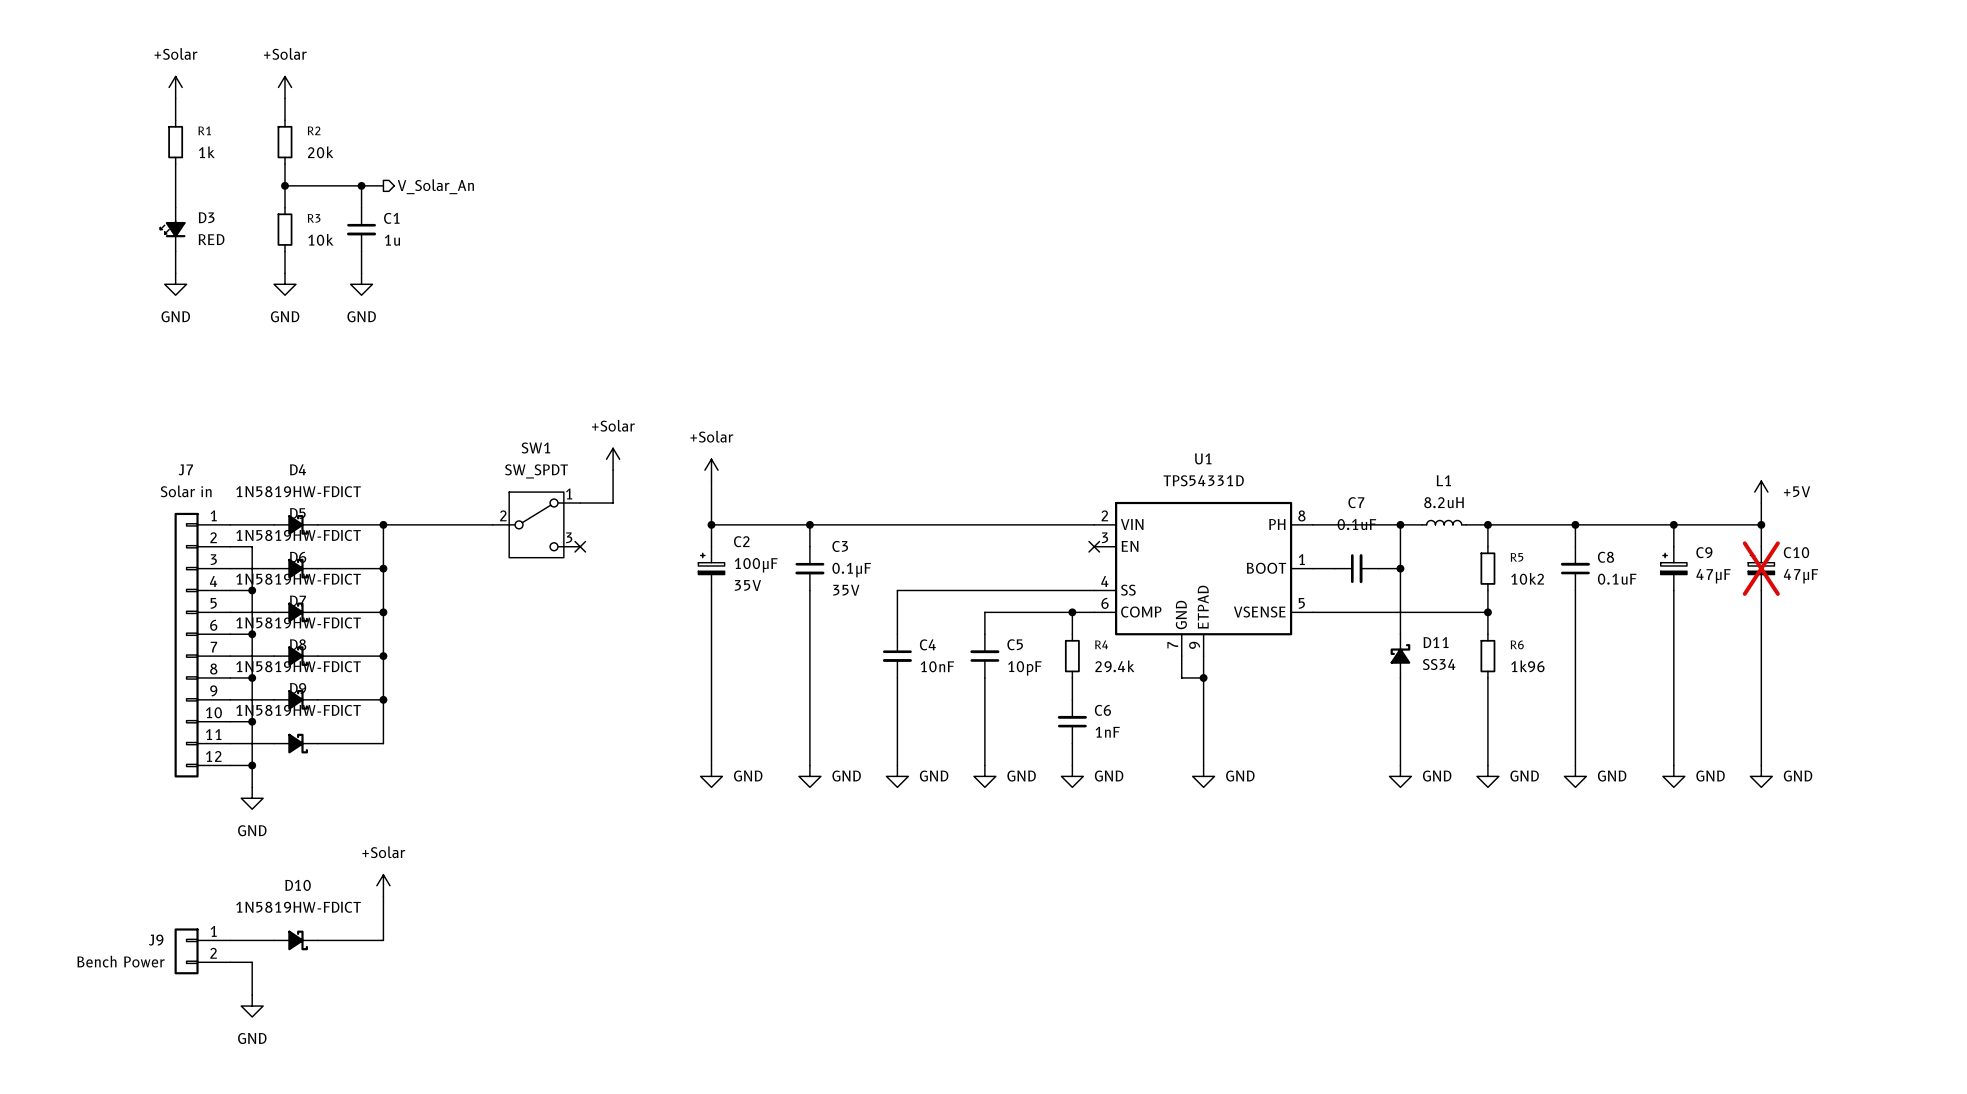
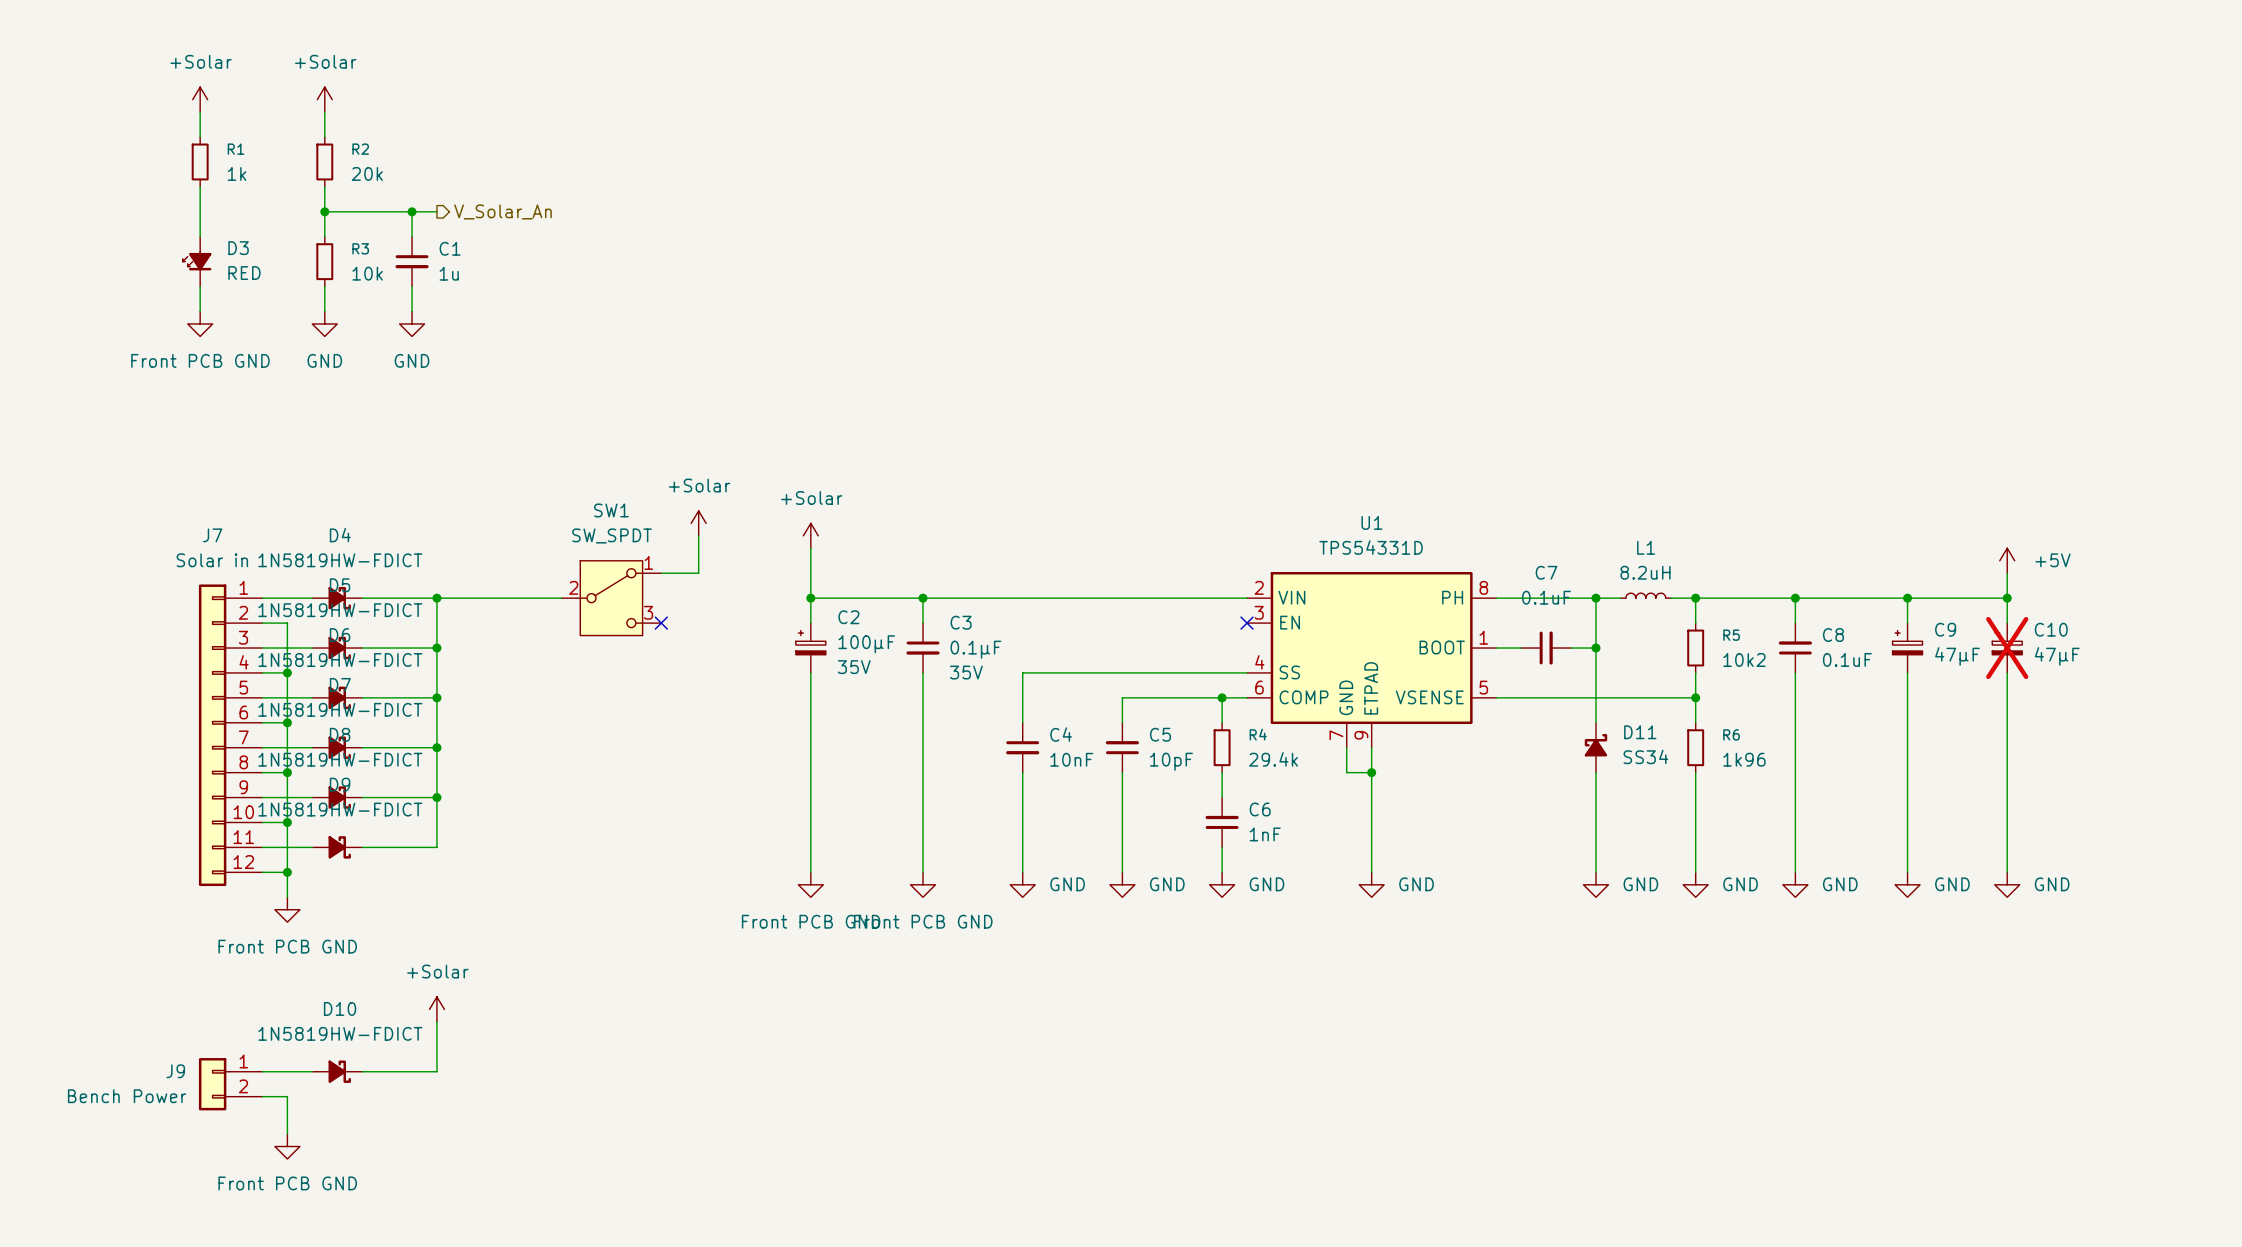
power symbol: GND (175, 284) -> Front PCB GND (200, 323)
power symbol: GND (711, 776) -> Front PCB GND (810, 884)
power symbol: GND (809, 776) -> Front PCB GND (923, 884)
power symbol: GND (252, 798) -> Front PCB GND (287, 909)
power symbol: GND (252, 1006) -> Front PCB GND (287, 1146)

